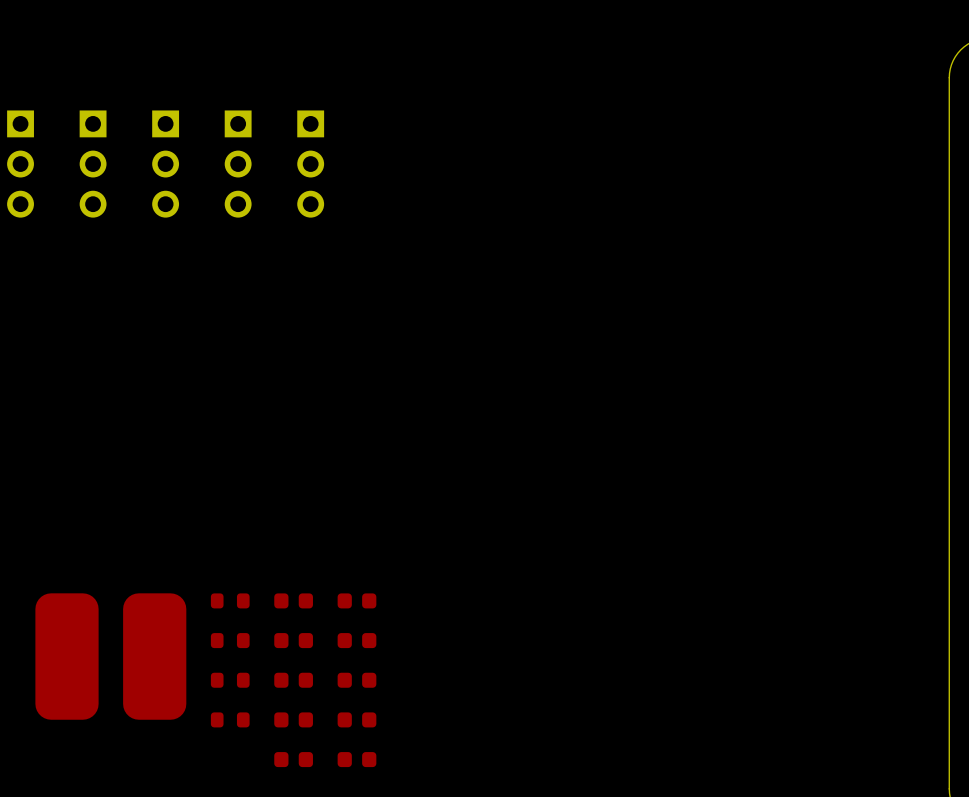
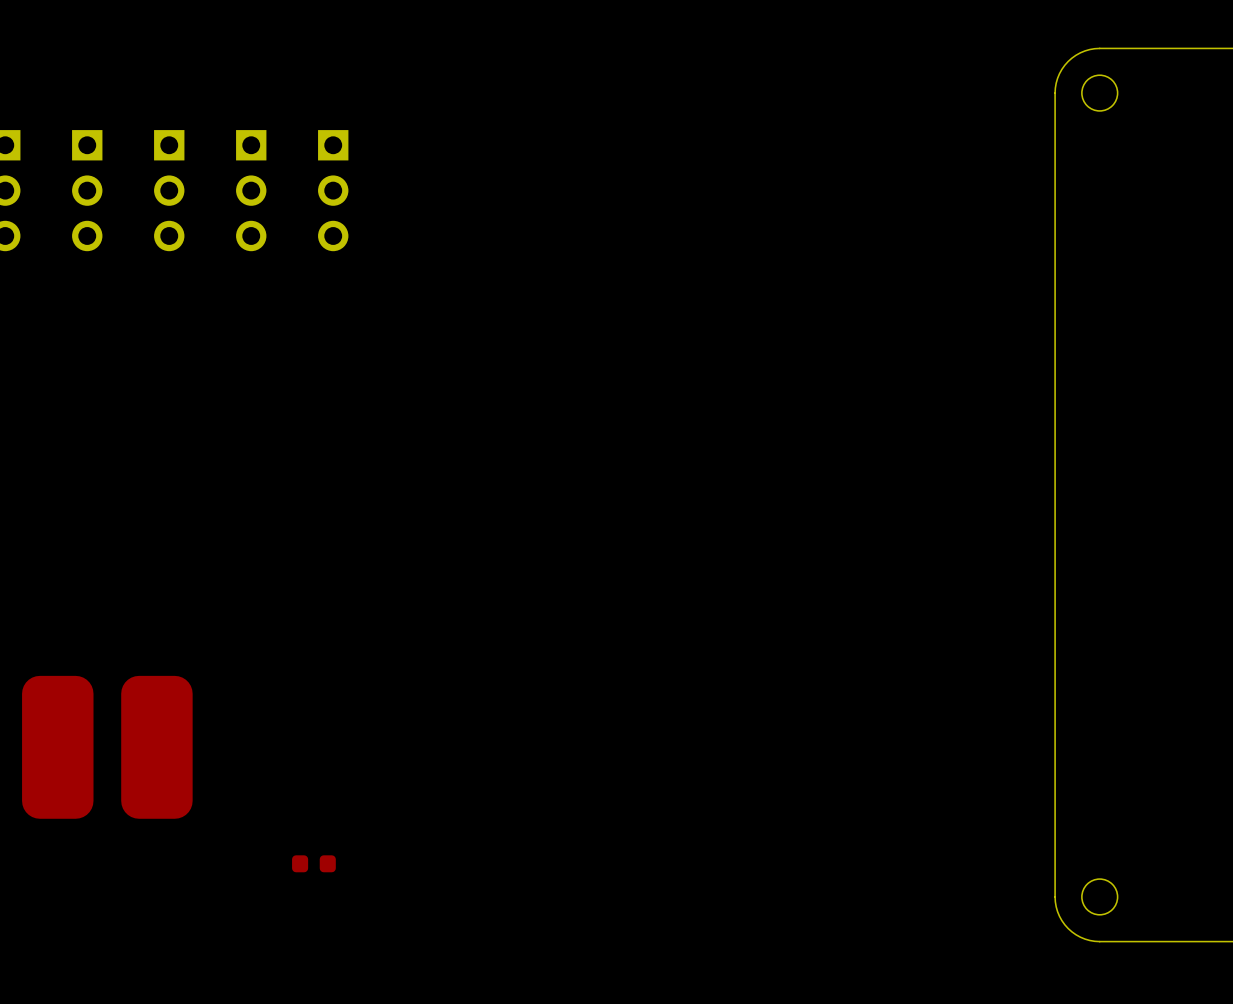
part: (230, 600) -> none
part: (293, 600) -> none
part: (356, 600) -> none
part: (230, 640) -> none
part: (293, 640) -> none
part: (356, 640) -> none
part: (230, 680) -> none
part: (293, 680) -> none
part: (356, 680) -> none
part: (230, 719) -> none
part: (293, 719) -> none
part: (356, 719) -> none
part: (356, 759) -> none

